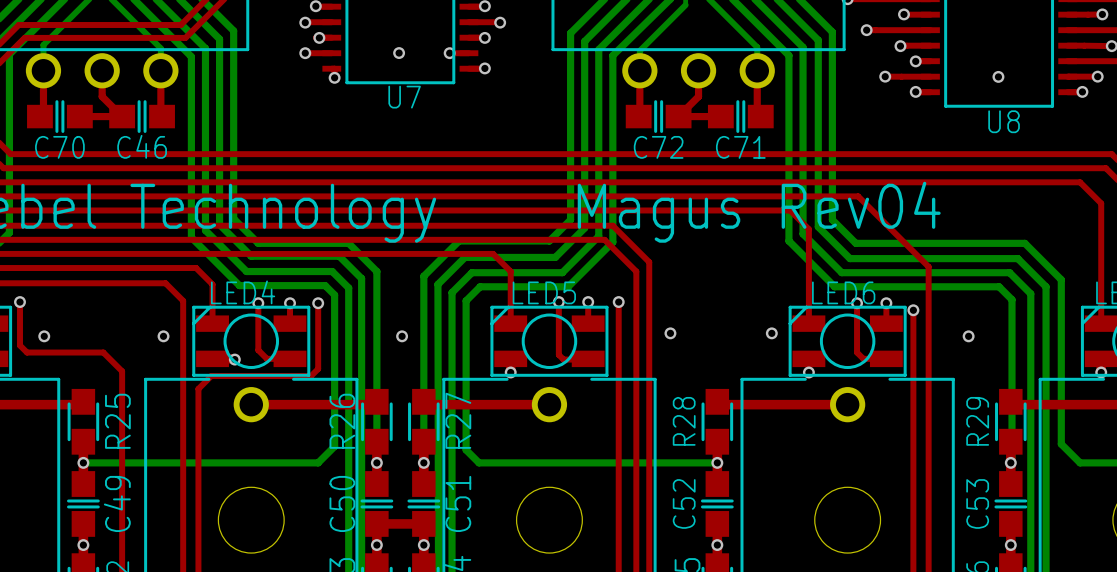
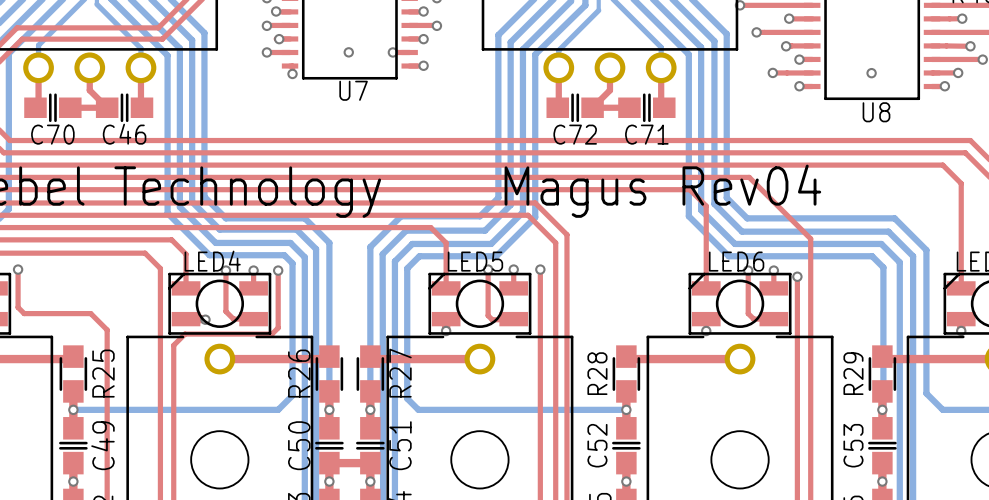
via: (670, 333) -> none
via: (771, 333) -> none
via: (44, 336) -> none
via: (163, 336) -> none
via: (402, 336) -> none
via: (968, 336) -> none

